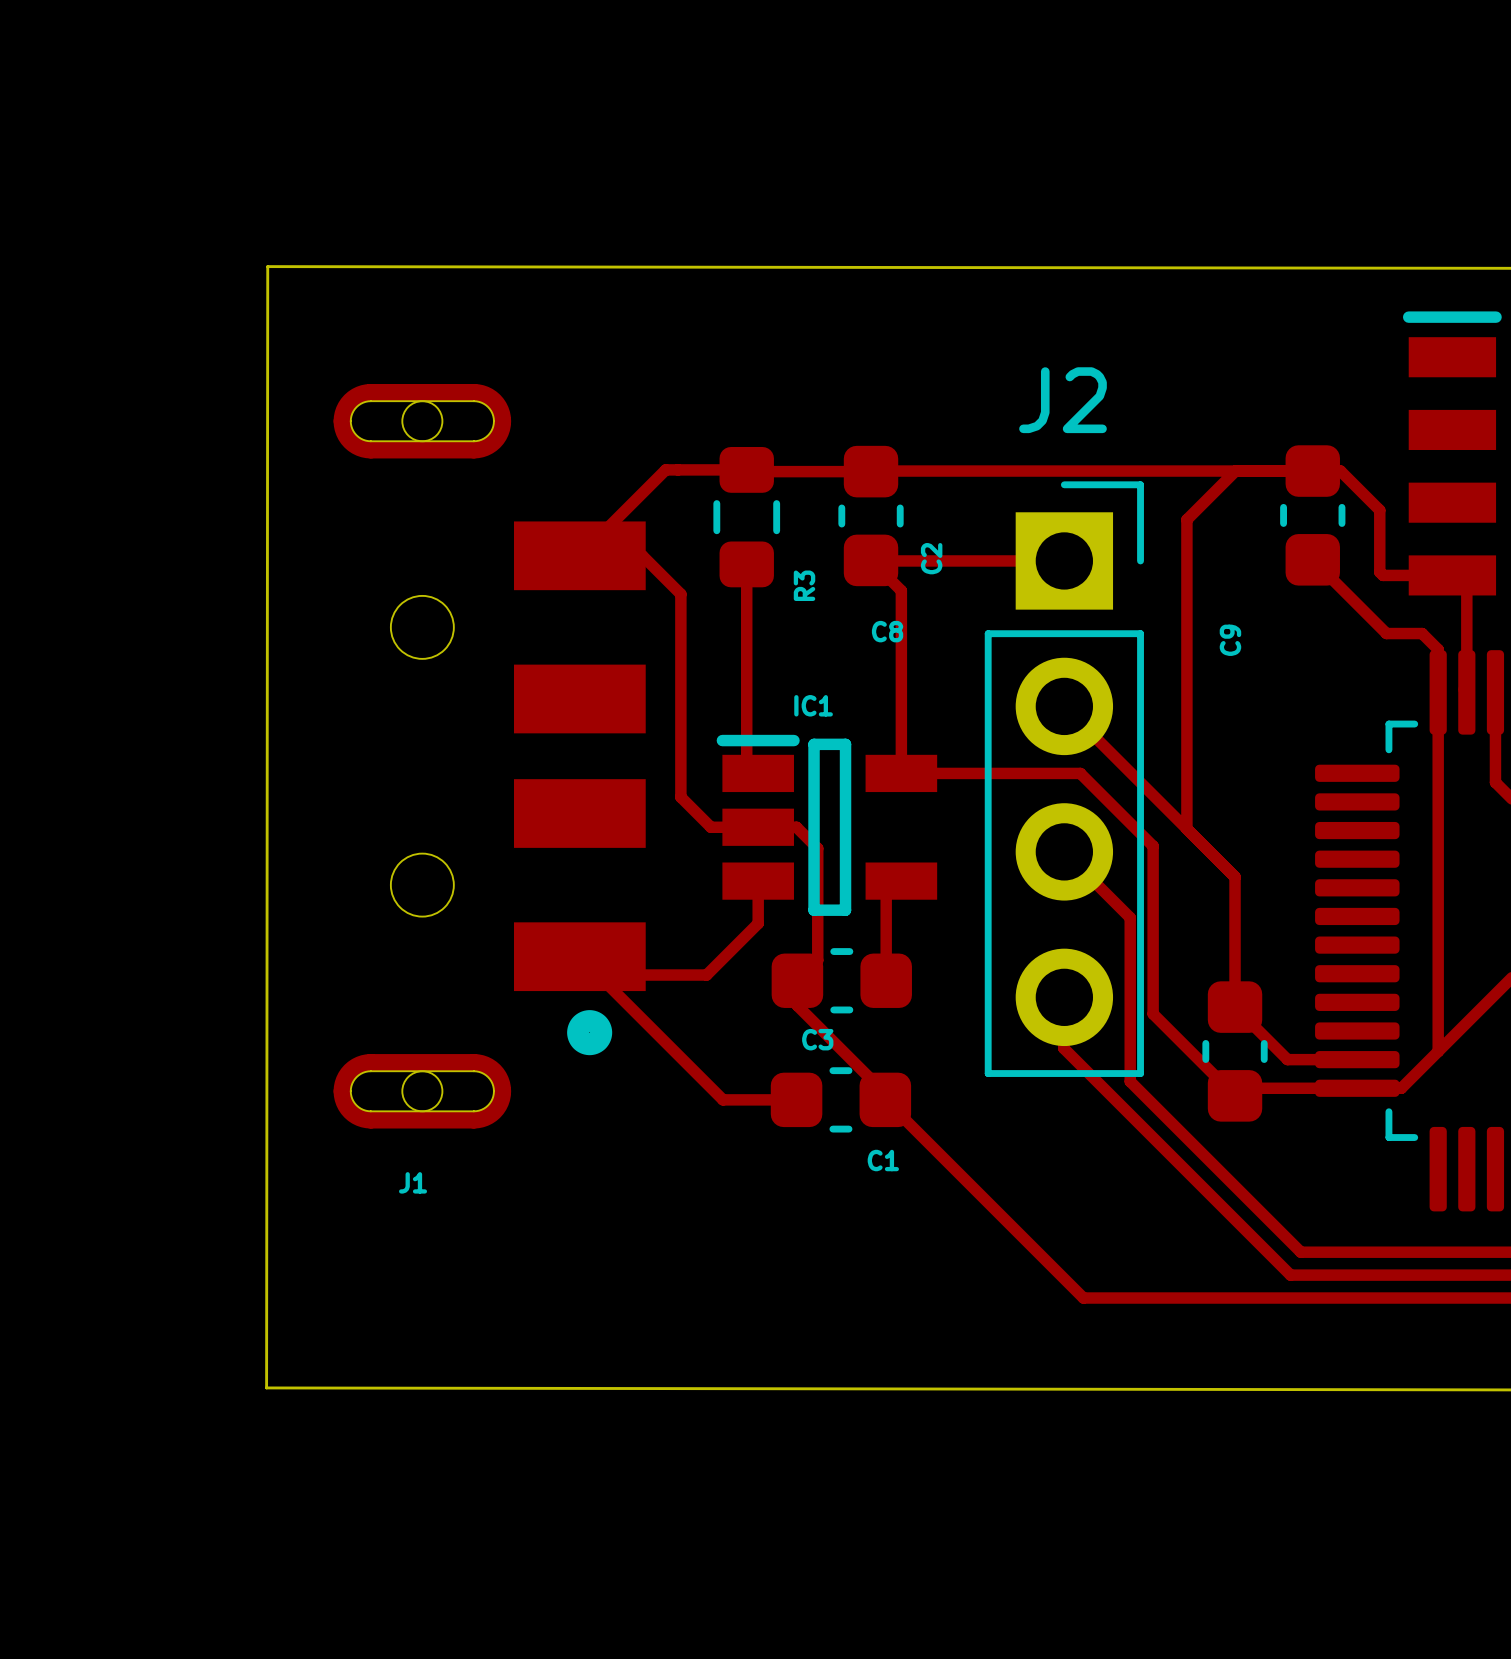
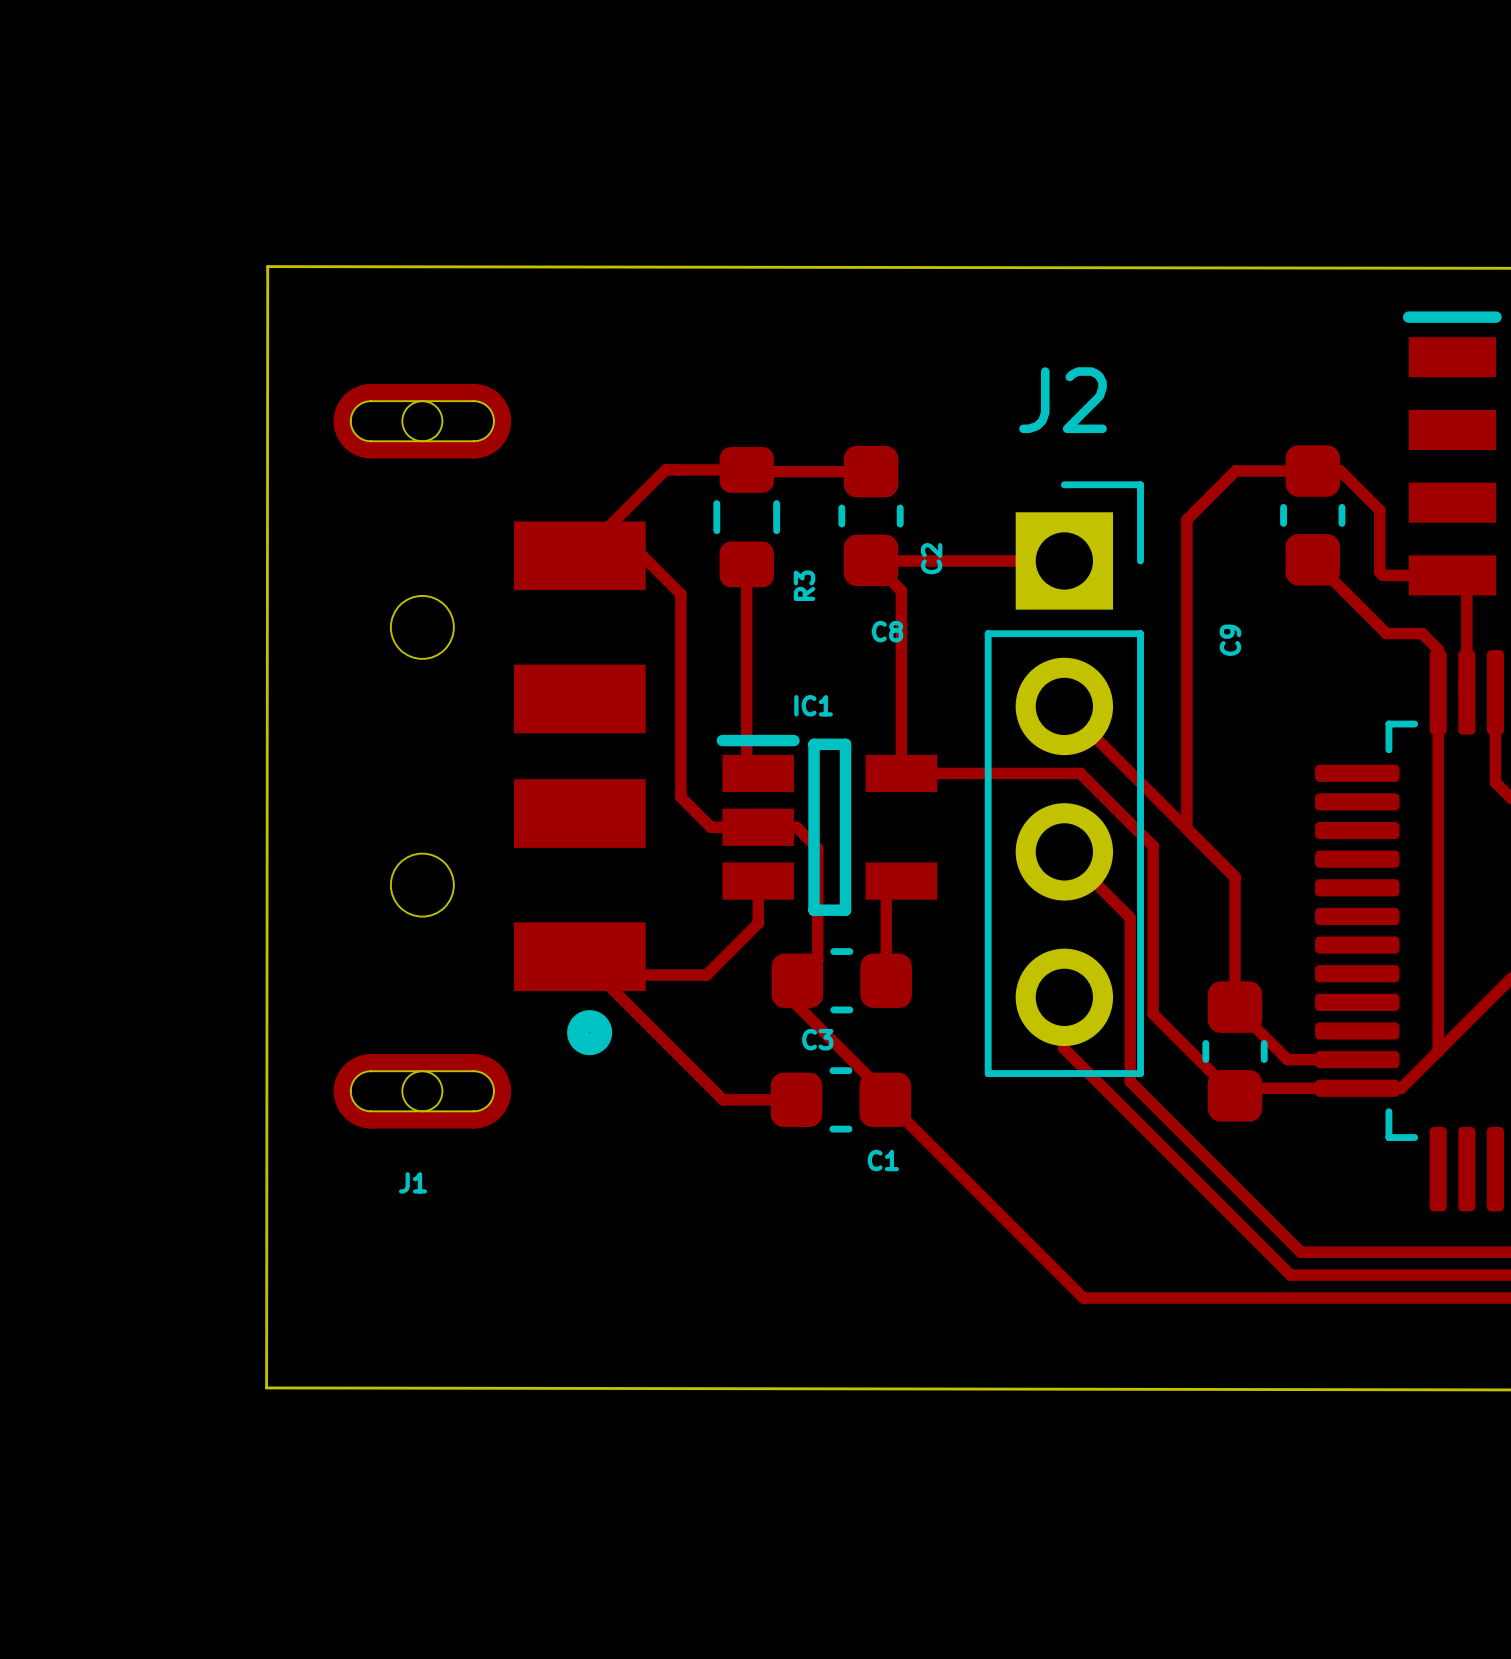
track: (871, 471) (1235, 471) -> none

